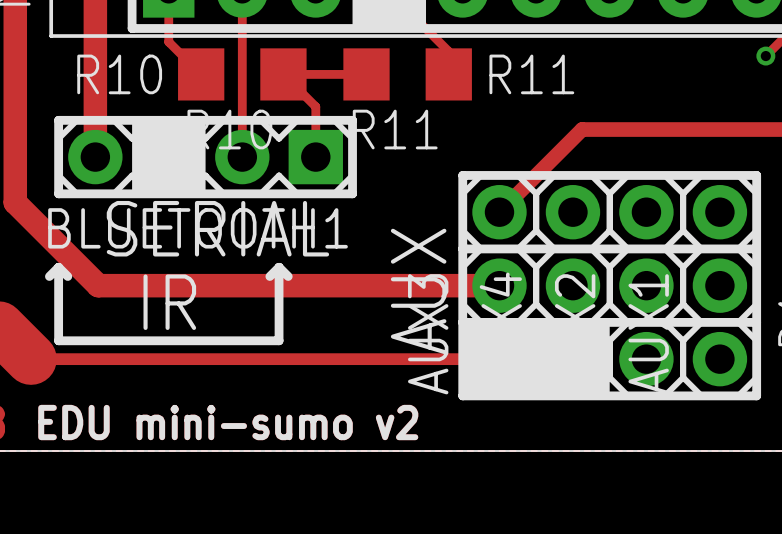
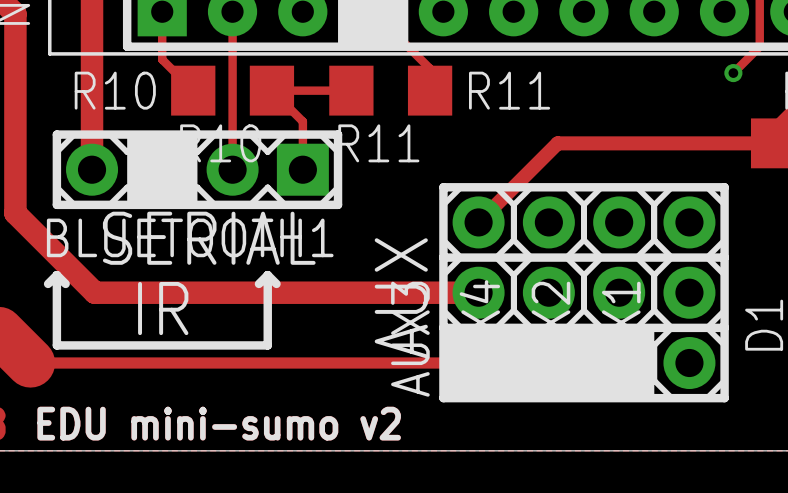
drawing: [462, 322, 610, 396] -> none
drawing: none -> [443, 327, 655, 399]

